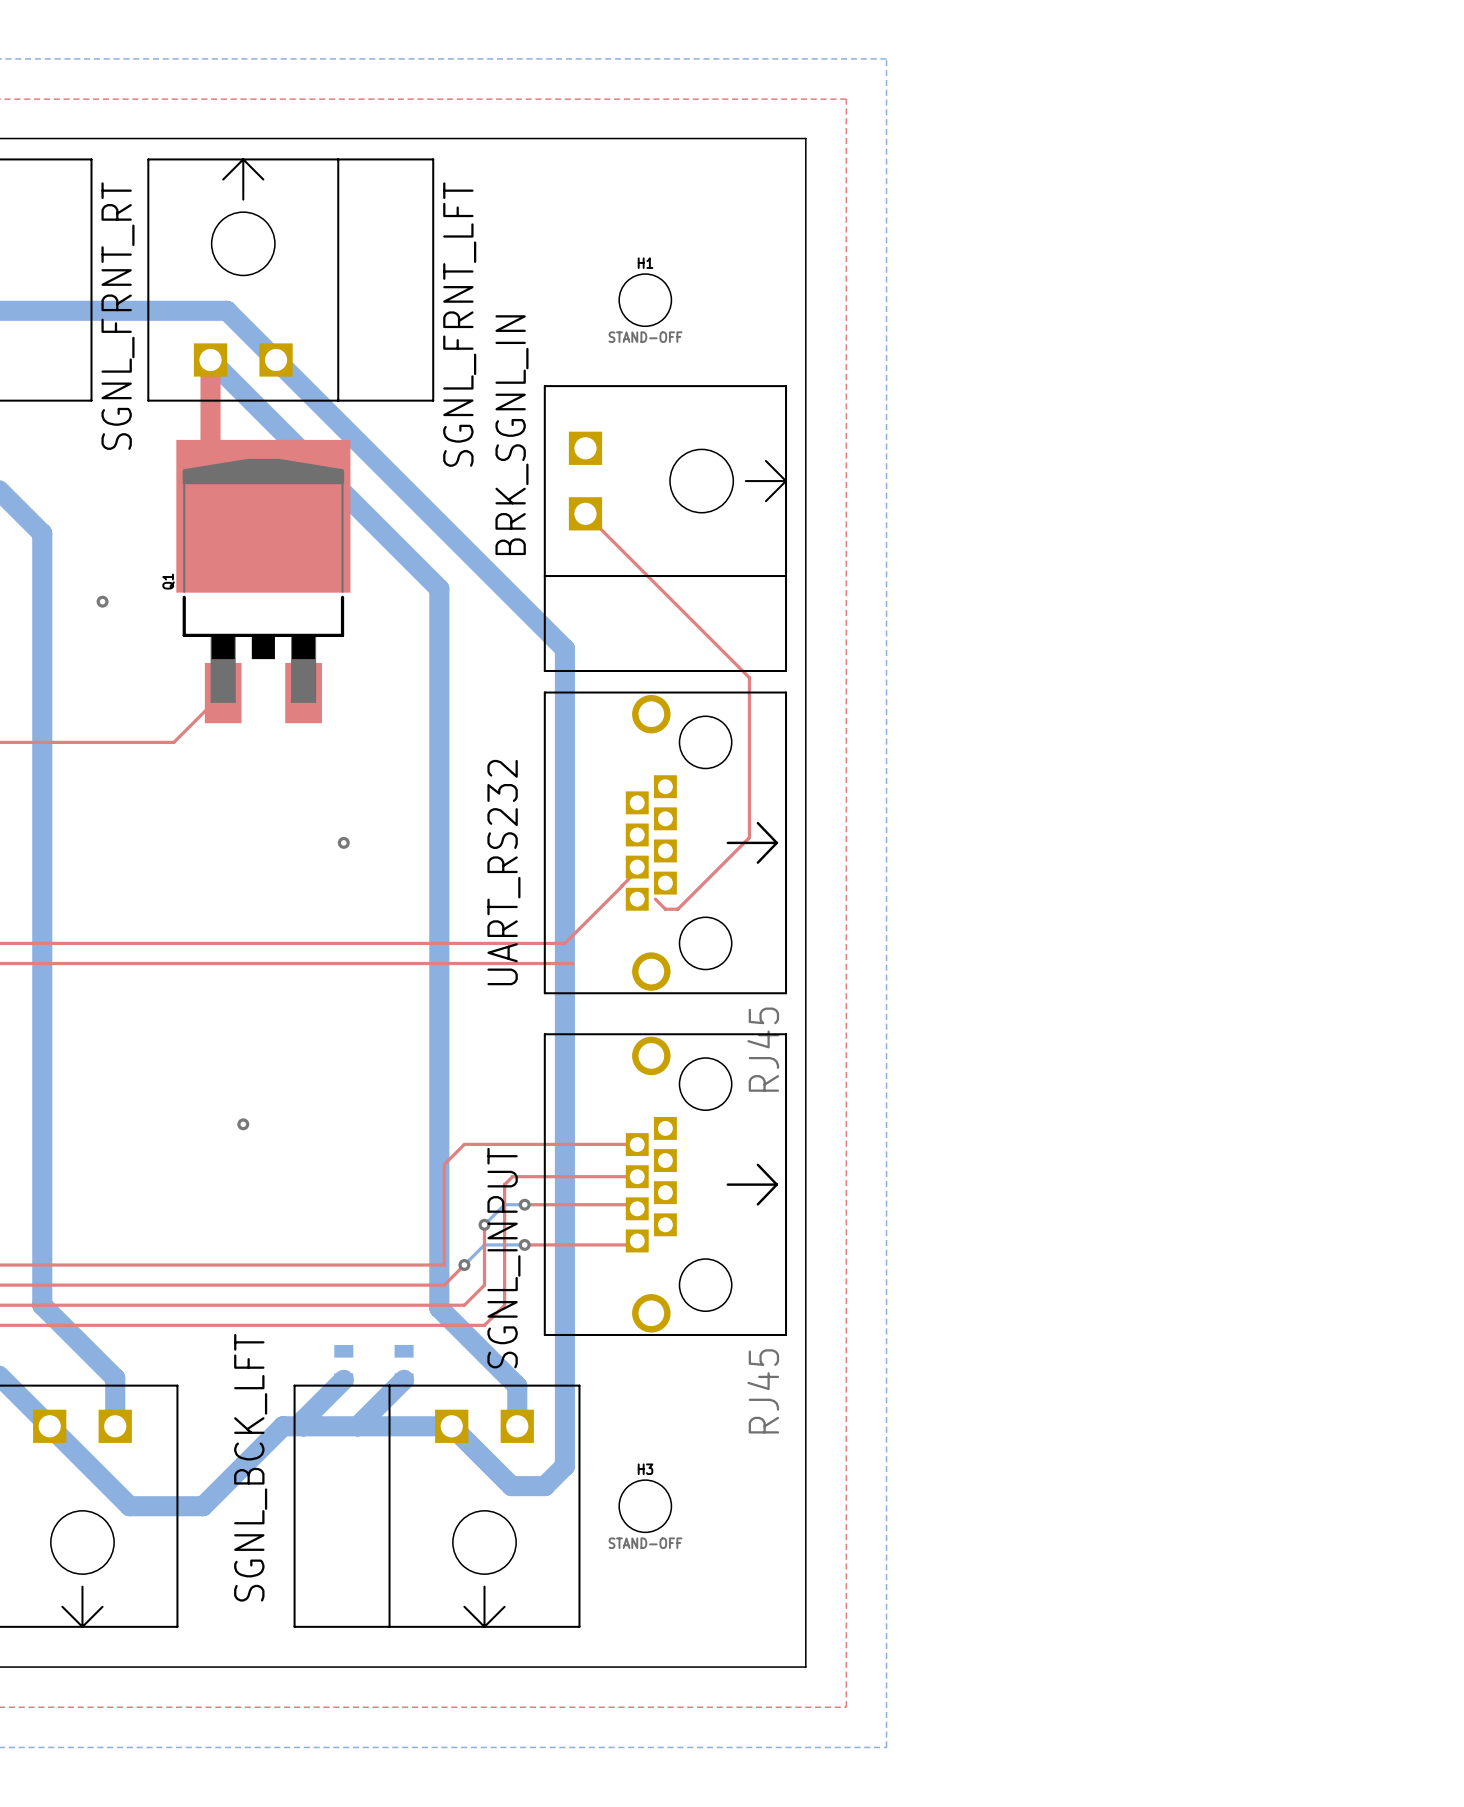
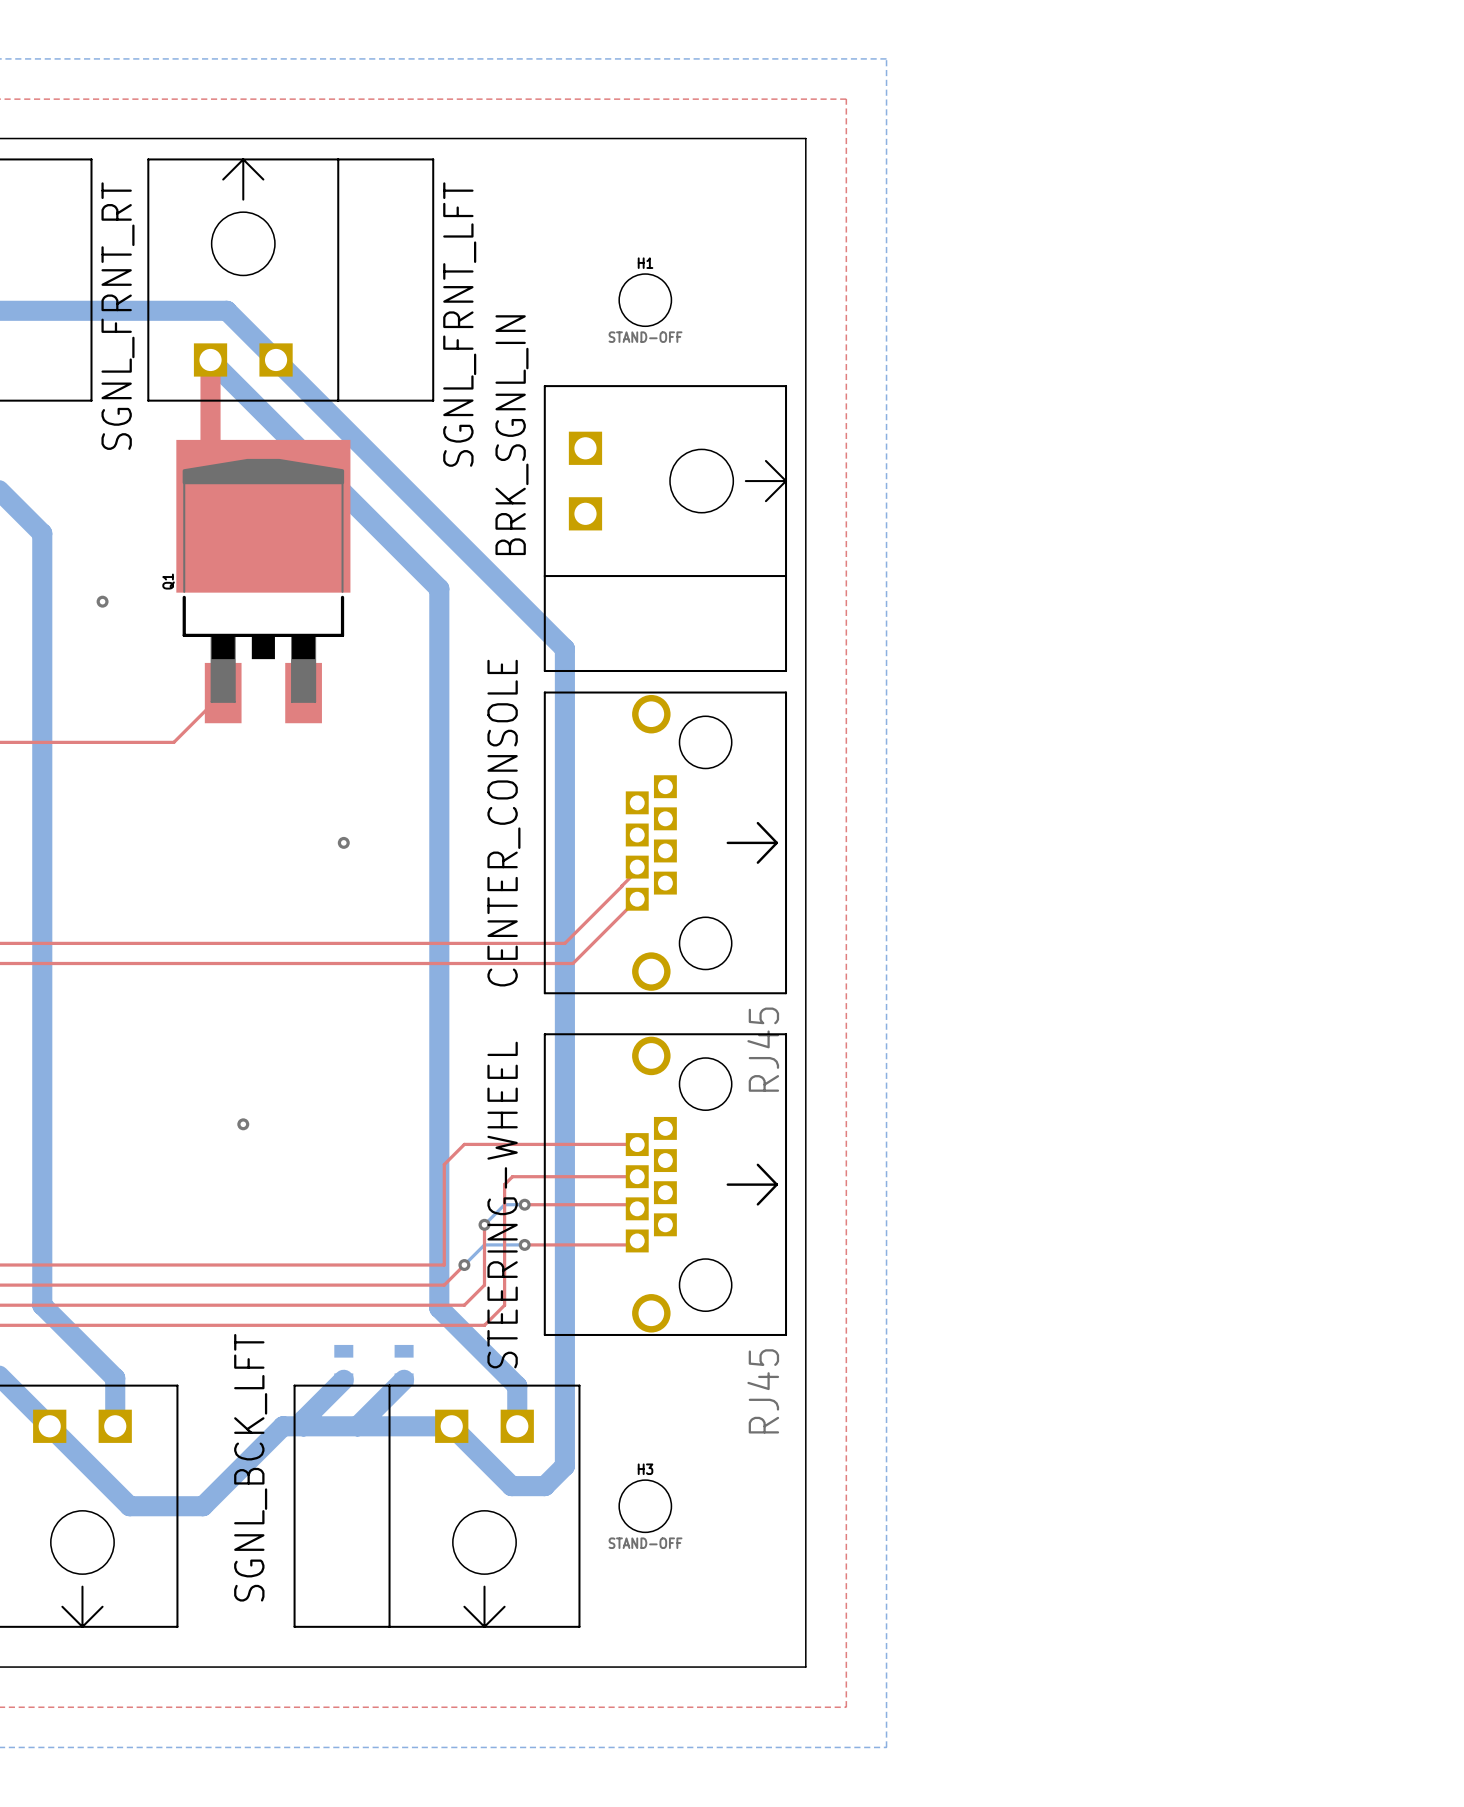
top track: (585, 513) (749, 677) (749, 837) (677, 909) (665, 909) (655, 899) -> none
UART_RS232 name: UART_RS232 (503, 872) -> CENTER_CONSOLE (503, 823)
top track: none -> (637, 899) (572, 963)
SGNL_INPUT name: SGNL_INPUT (503, 1258) -> STEERING-WHEEL (502, 1205)

